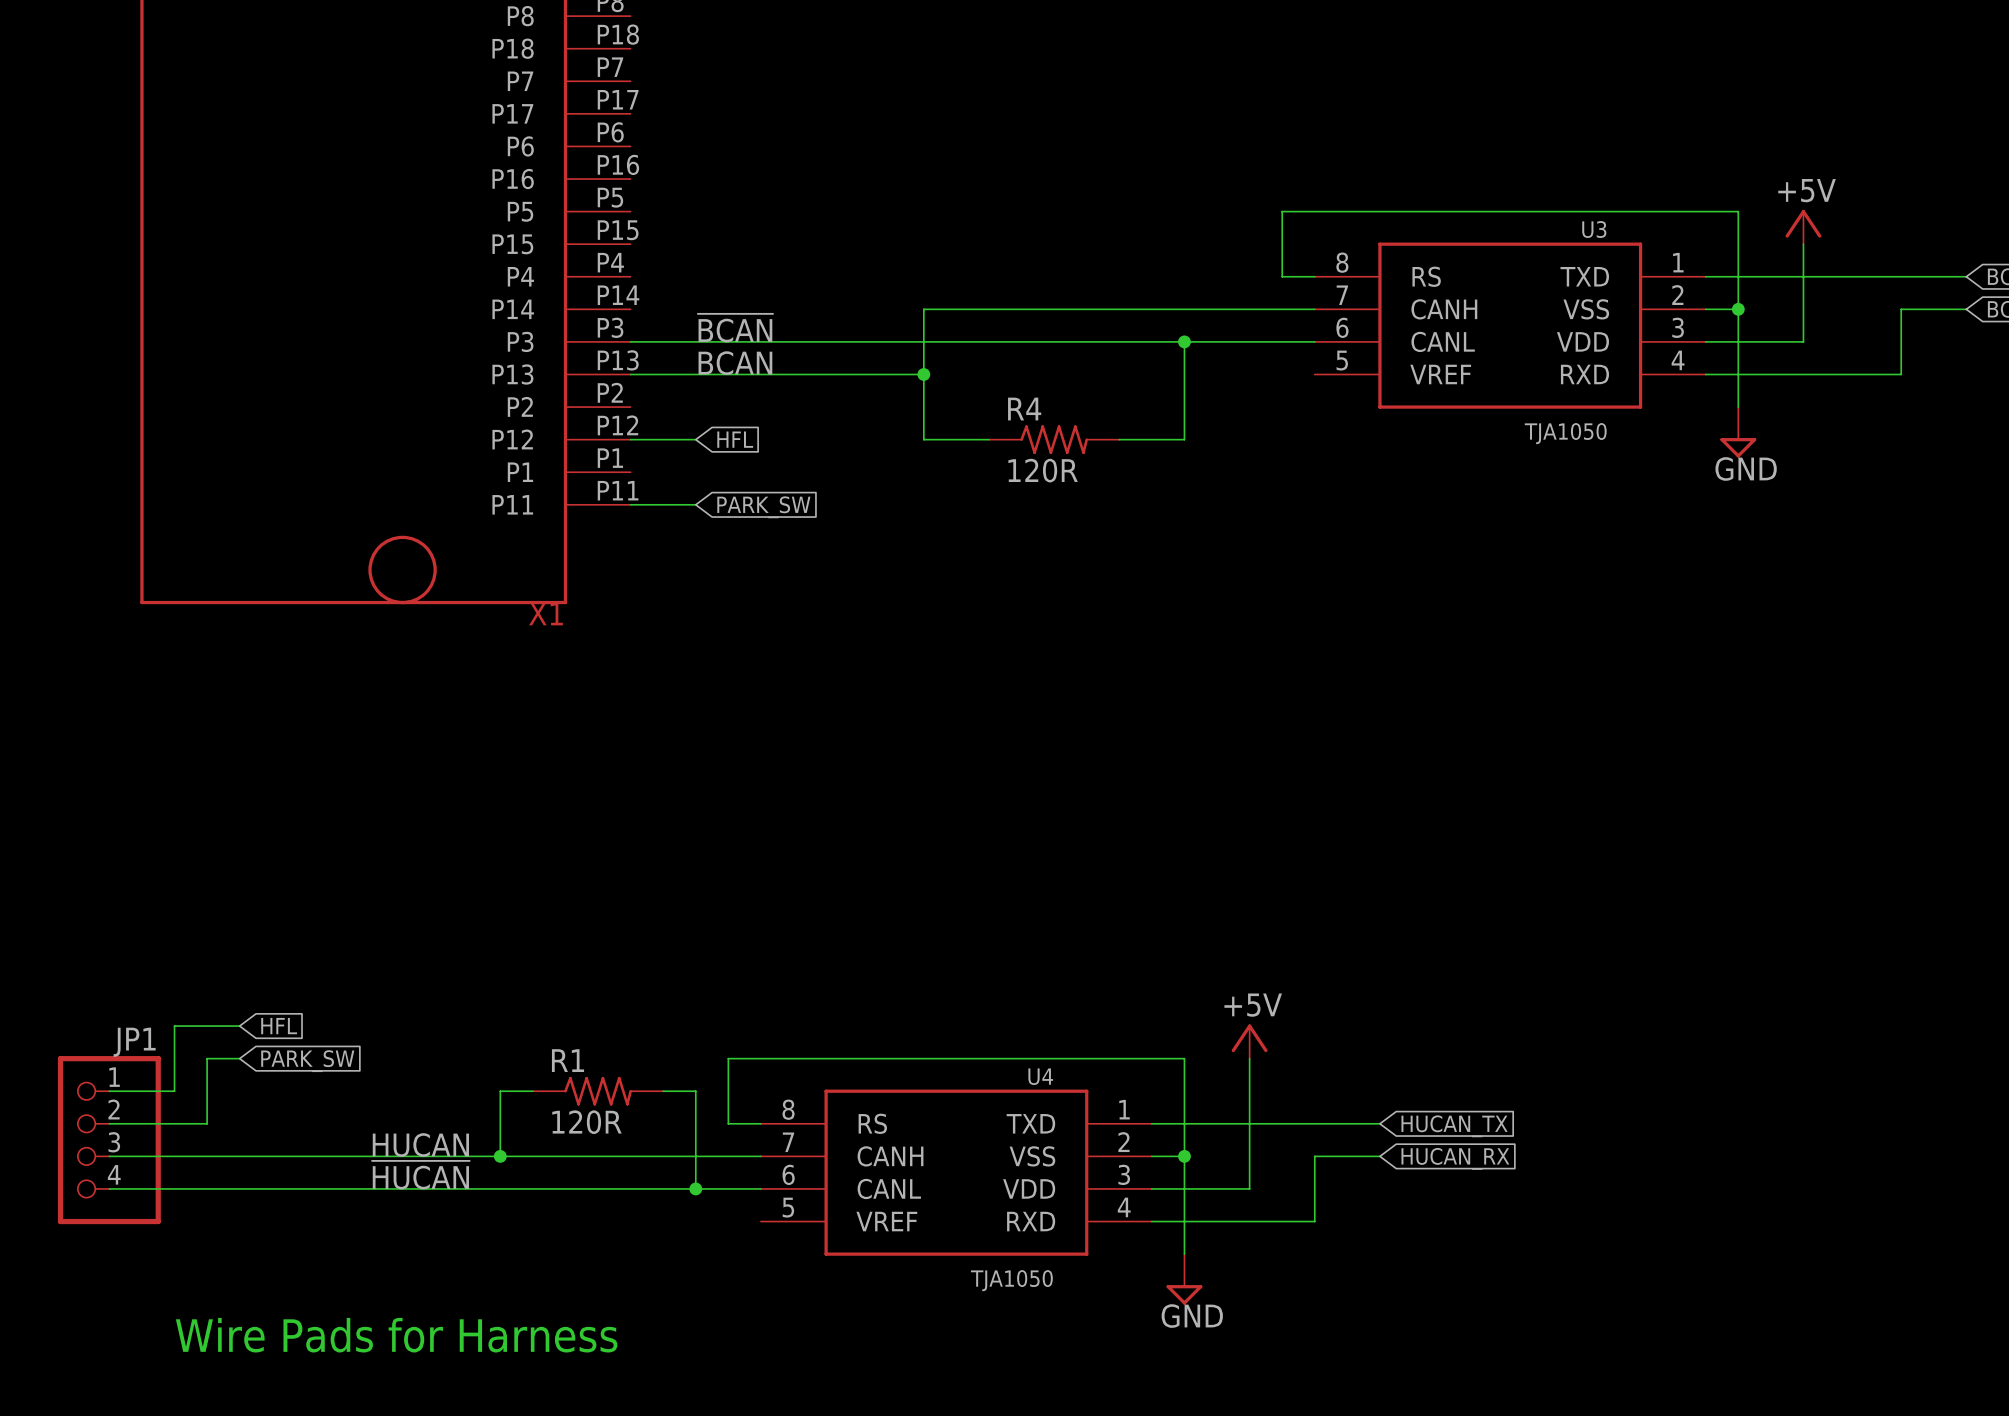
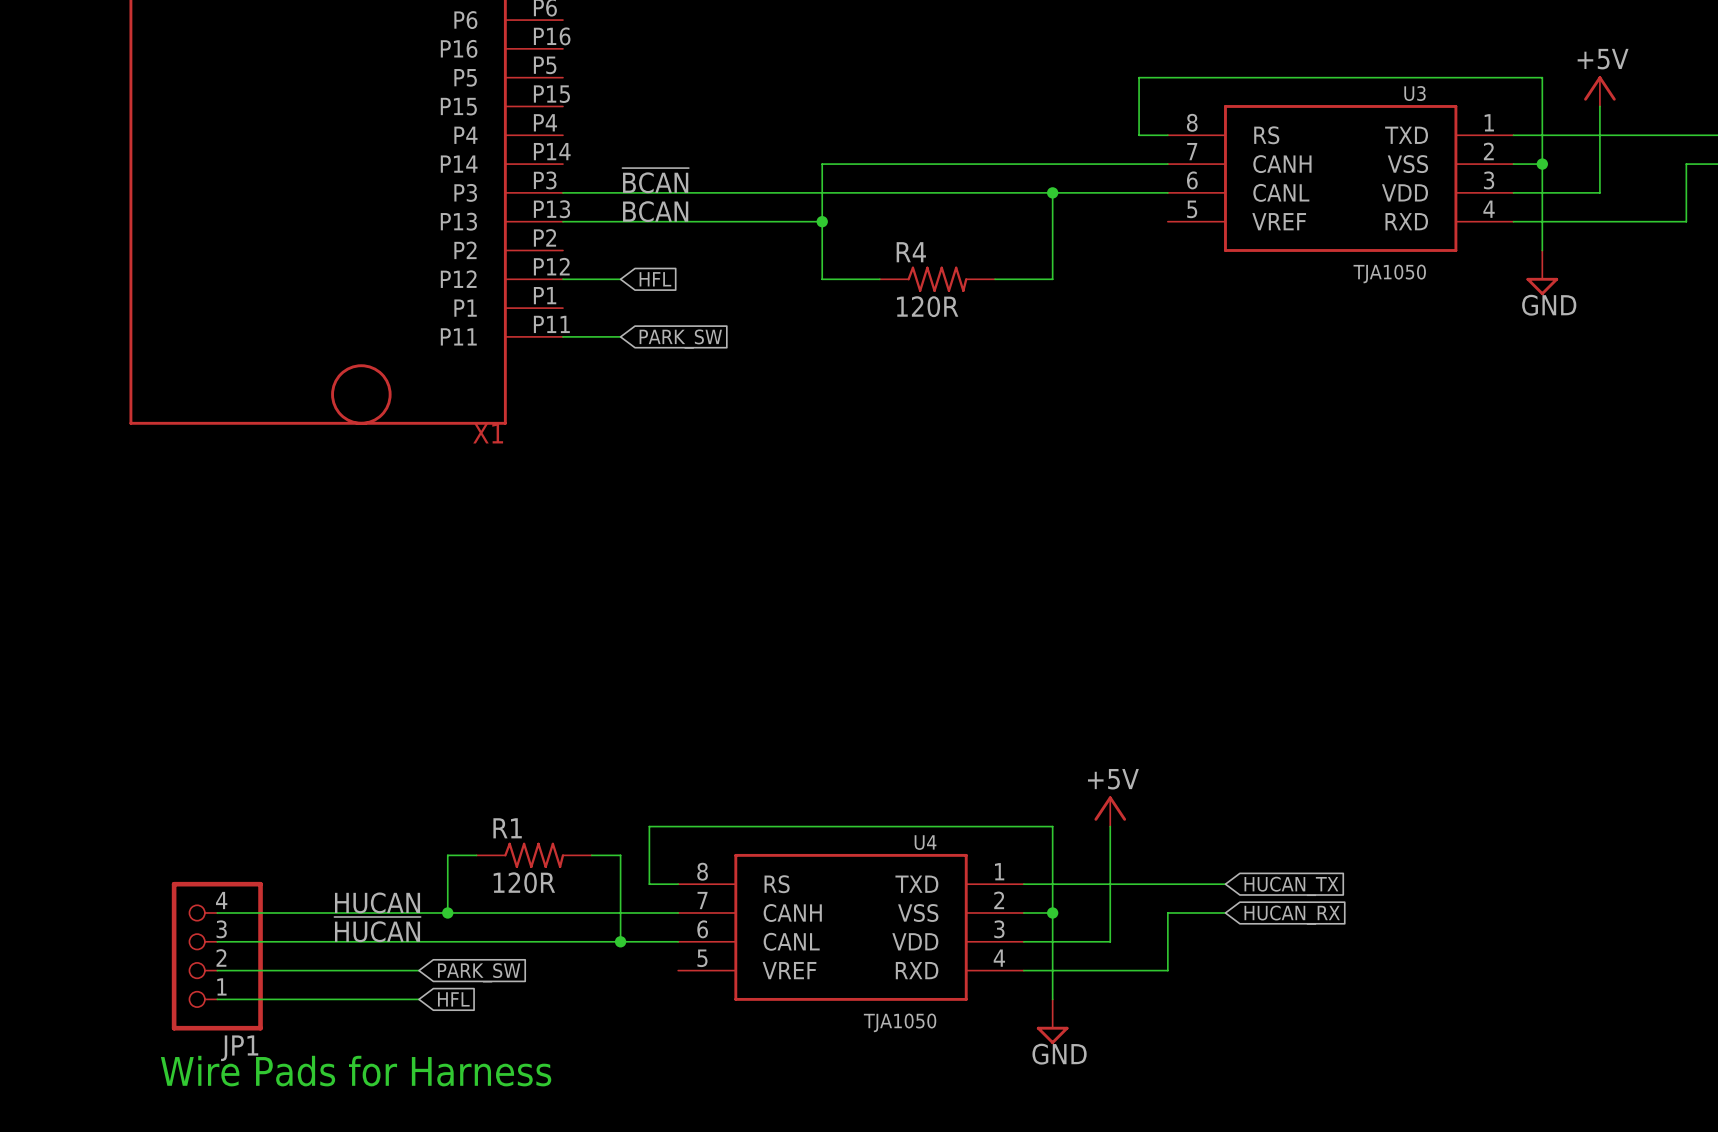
wire: (239, 1026) (174, 1026) (174, 1091) (109, 1091) -> none
global label: HFL (279, 1026) -> none
wire: (239, 1058) (207, 1058) (207, 1123) (109, 1123) -> none
global label position: PARK_SW (307, 1061) -> PARK_SW (479, 972)
JP1 flip: as is (109, 1140) -> up-down (217, 956)
JP1 position: (109, 1140) -> (217, 956)
wire: (109, 1156) (239, 1156) -> none
wire: (109, 1188) (239, 1188) -> none
wire: none -> (217, 970) (418, 970)
wire: none -> (217, 999) (418, 999)
global label: none -> HFL (453, 999)

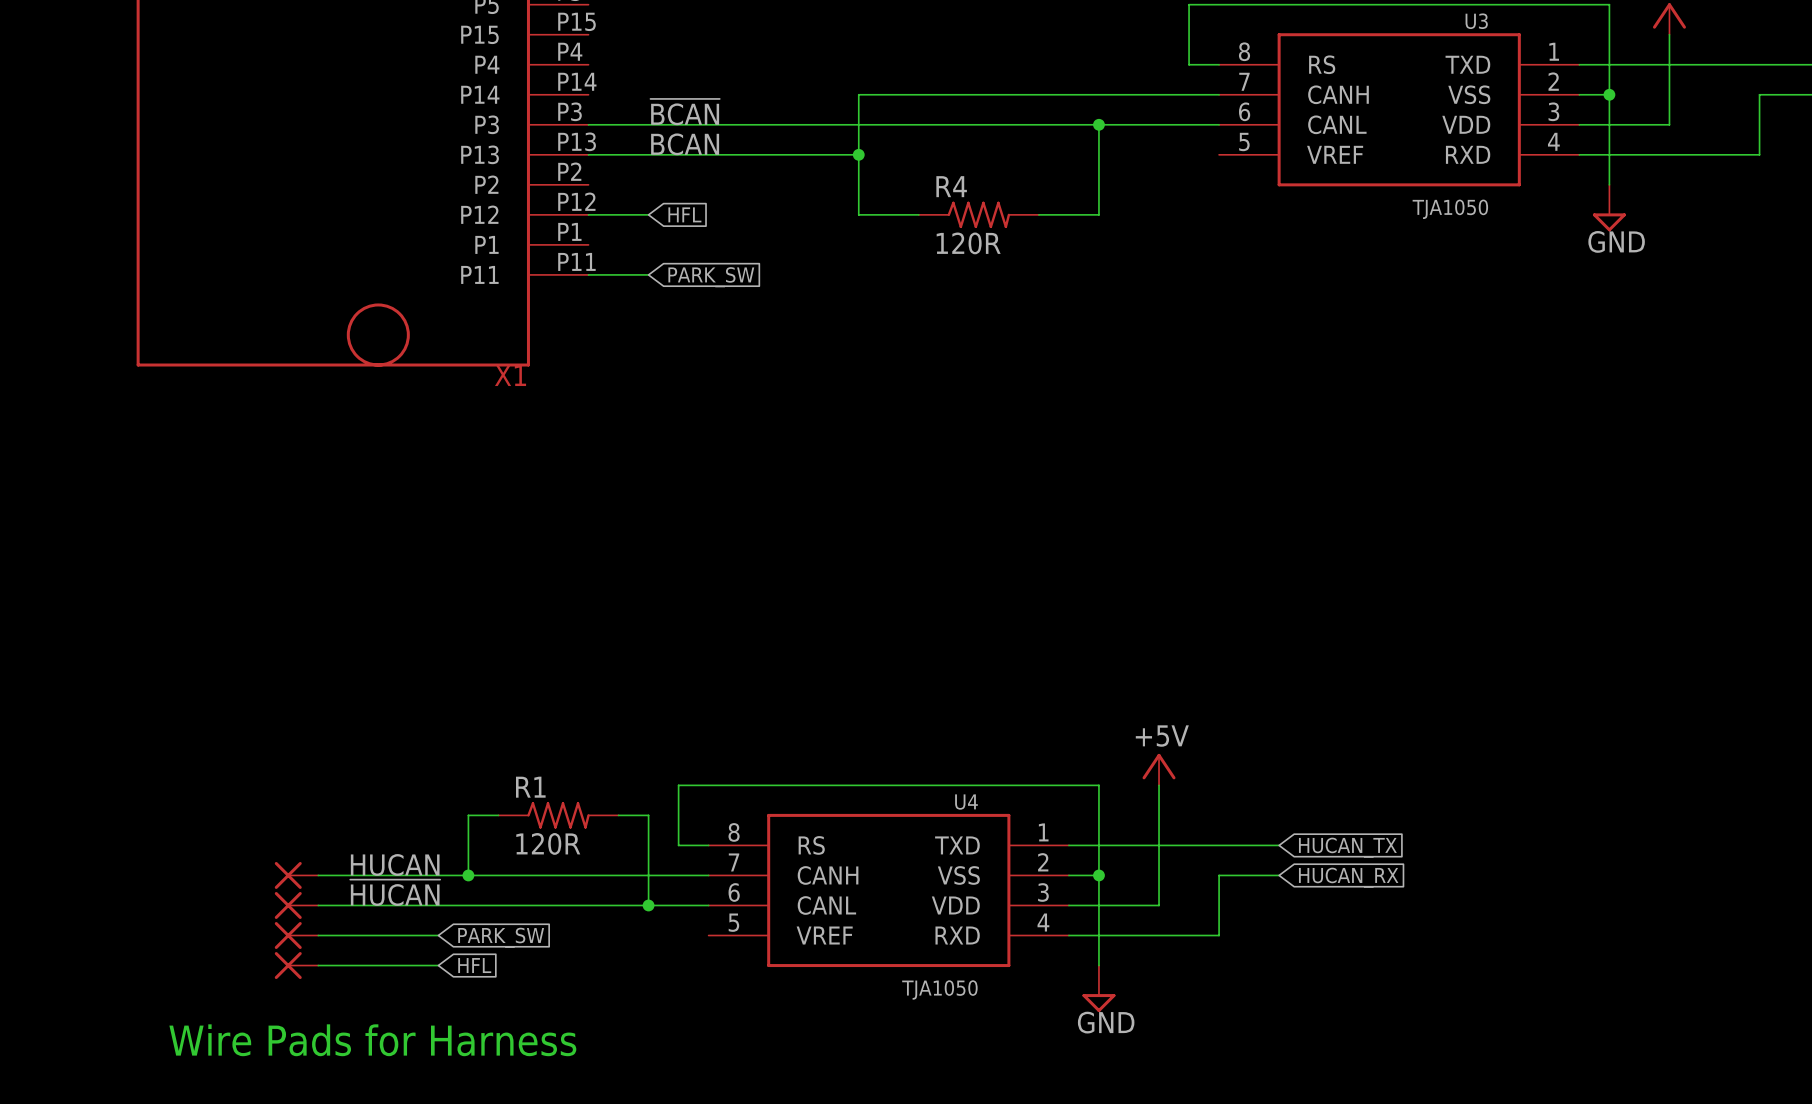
wire: (217, 912) (303, 912) -> none
part: none -> (296, 875)
wire: (217, 941) (303, 941) -> none
part: none -> (296, 905)
JP1: (217, 956) -> none
wire: (217, 970) (303, 970) -> none
part: none -> (296, 935)
wire: (217, 999) (303, 999) -> none
part: none -> (296, 965)

